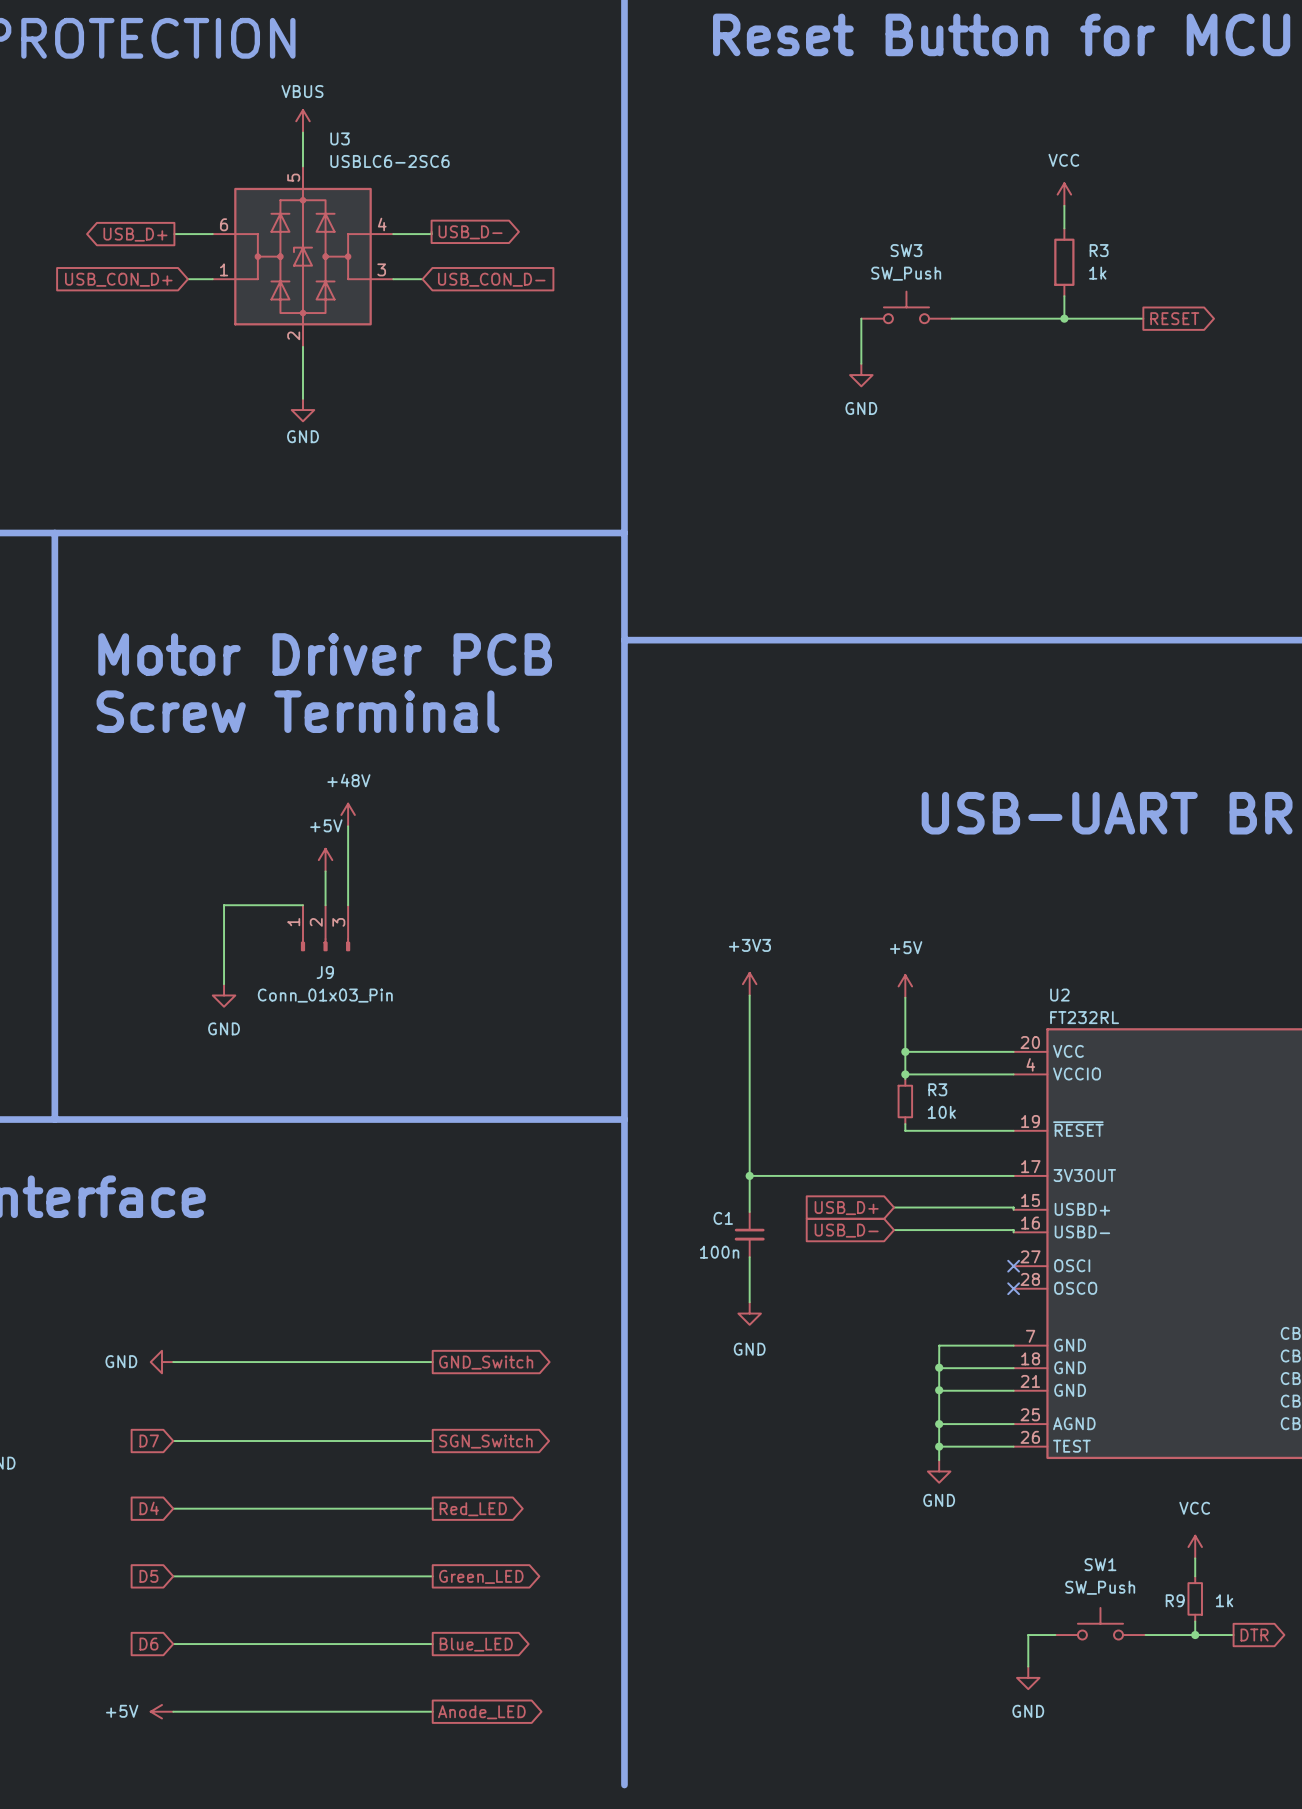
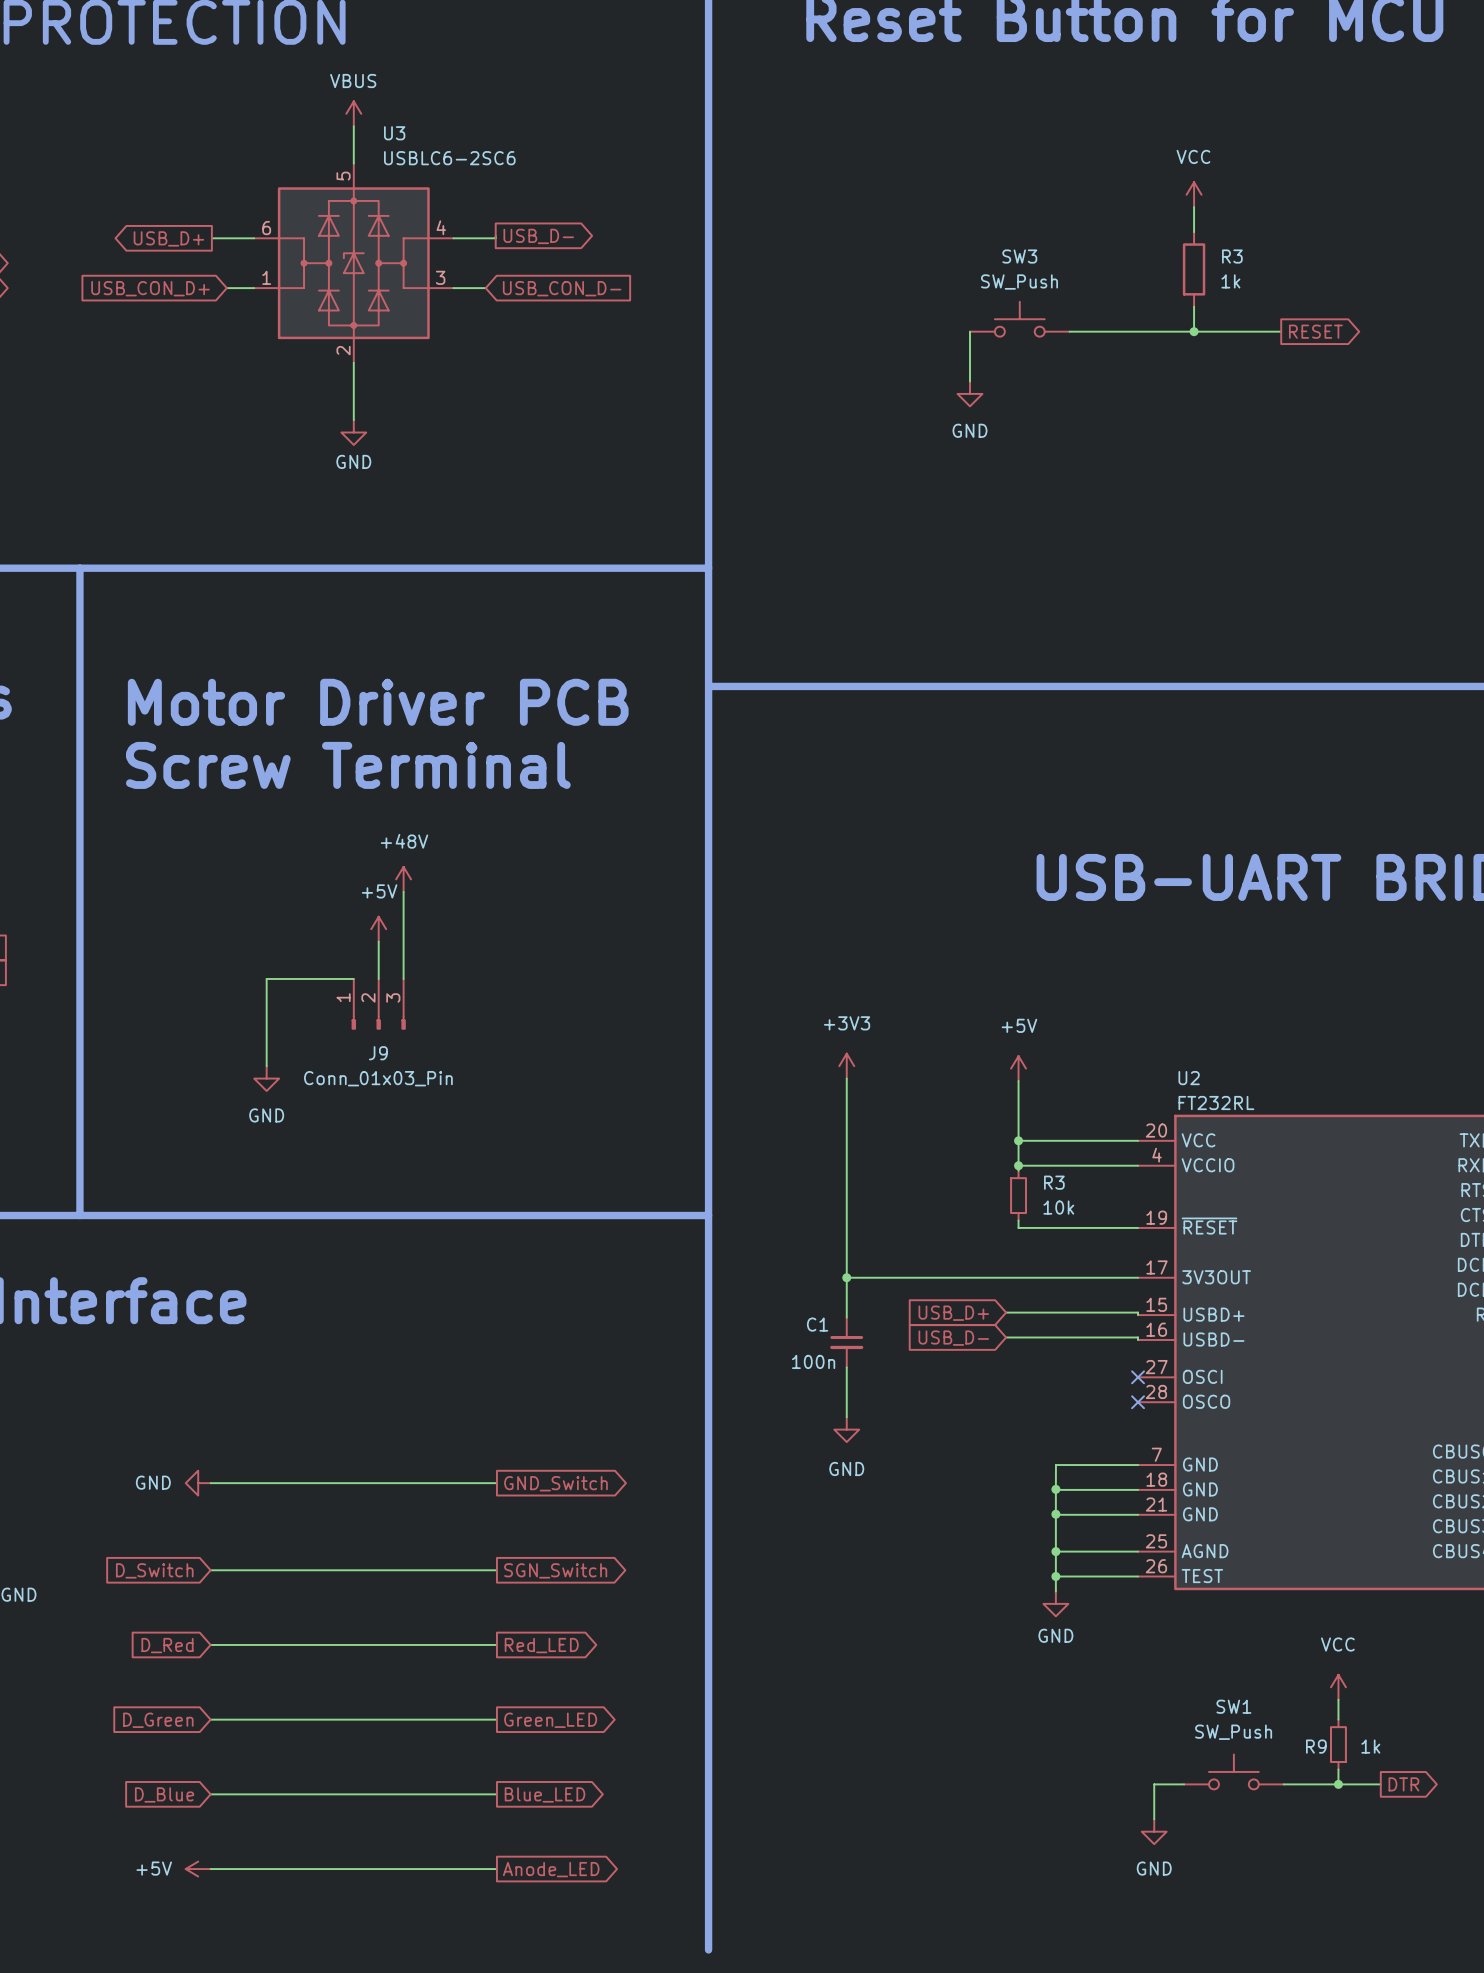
global label: D7 (149, 1441) -> D_Switch (154, 1570)
global label: D4 (149, 1508) -> D_Red (167, 1645)
global label: D5 (148, 1576) -> D_Green (158, 1720)
global label: D6 (148, 1644) -> D_Blue (164, 1794)

